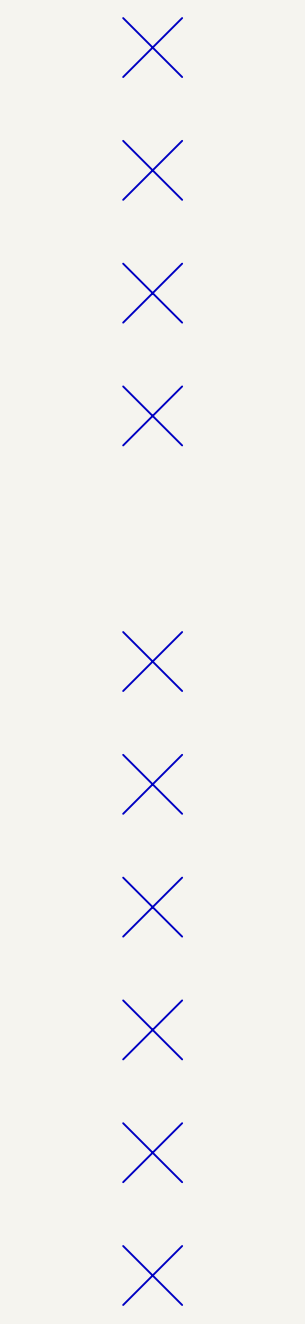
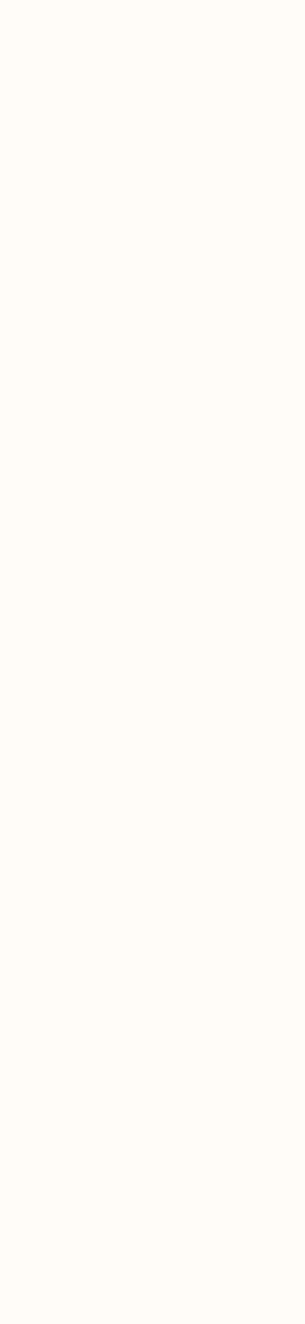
no-connect mark: (152, 47) -> none
no-connect mark: (152, 170) -> none
no-connect mark: (152, 293) -> none
no-connect mark: (152, 415) -> none
no-connect mark: (152, 661) -> none
no-connect mark: (152, 784) -> none
no-connect mark: (152, 907) -> none
no-connect mark: (152, 1029) -> none
no-connect mark: (152, 1152) -> none
no-connect mark: (152, 1275) -> none

